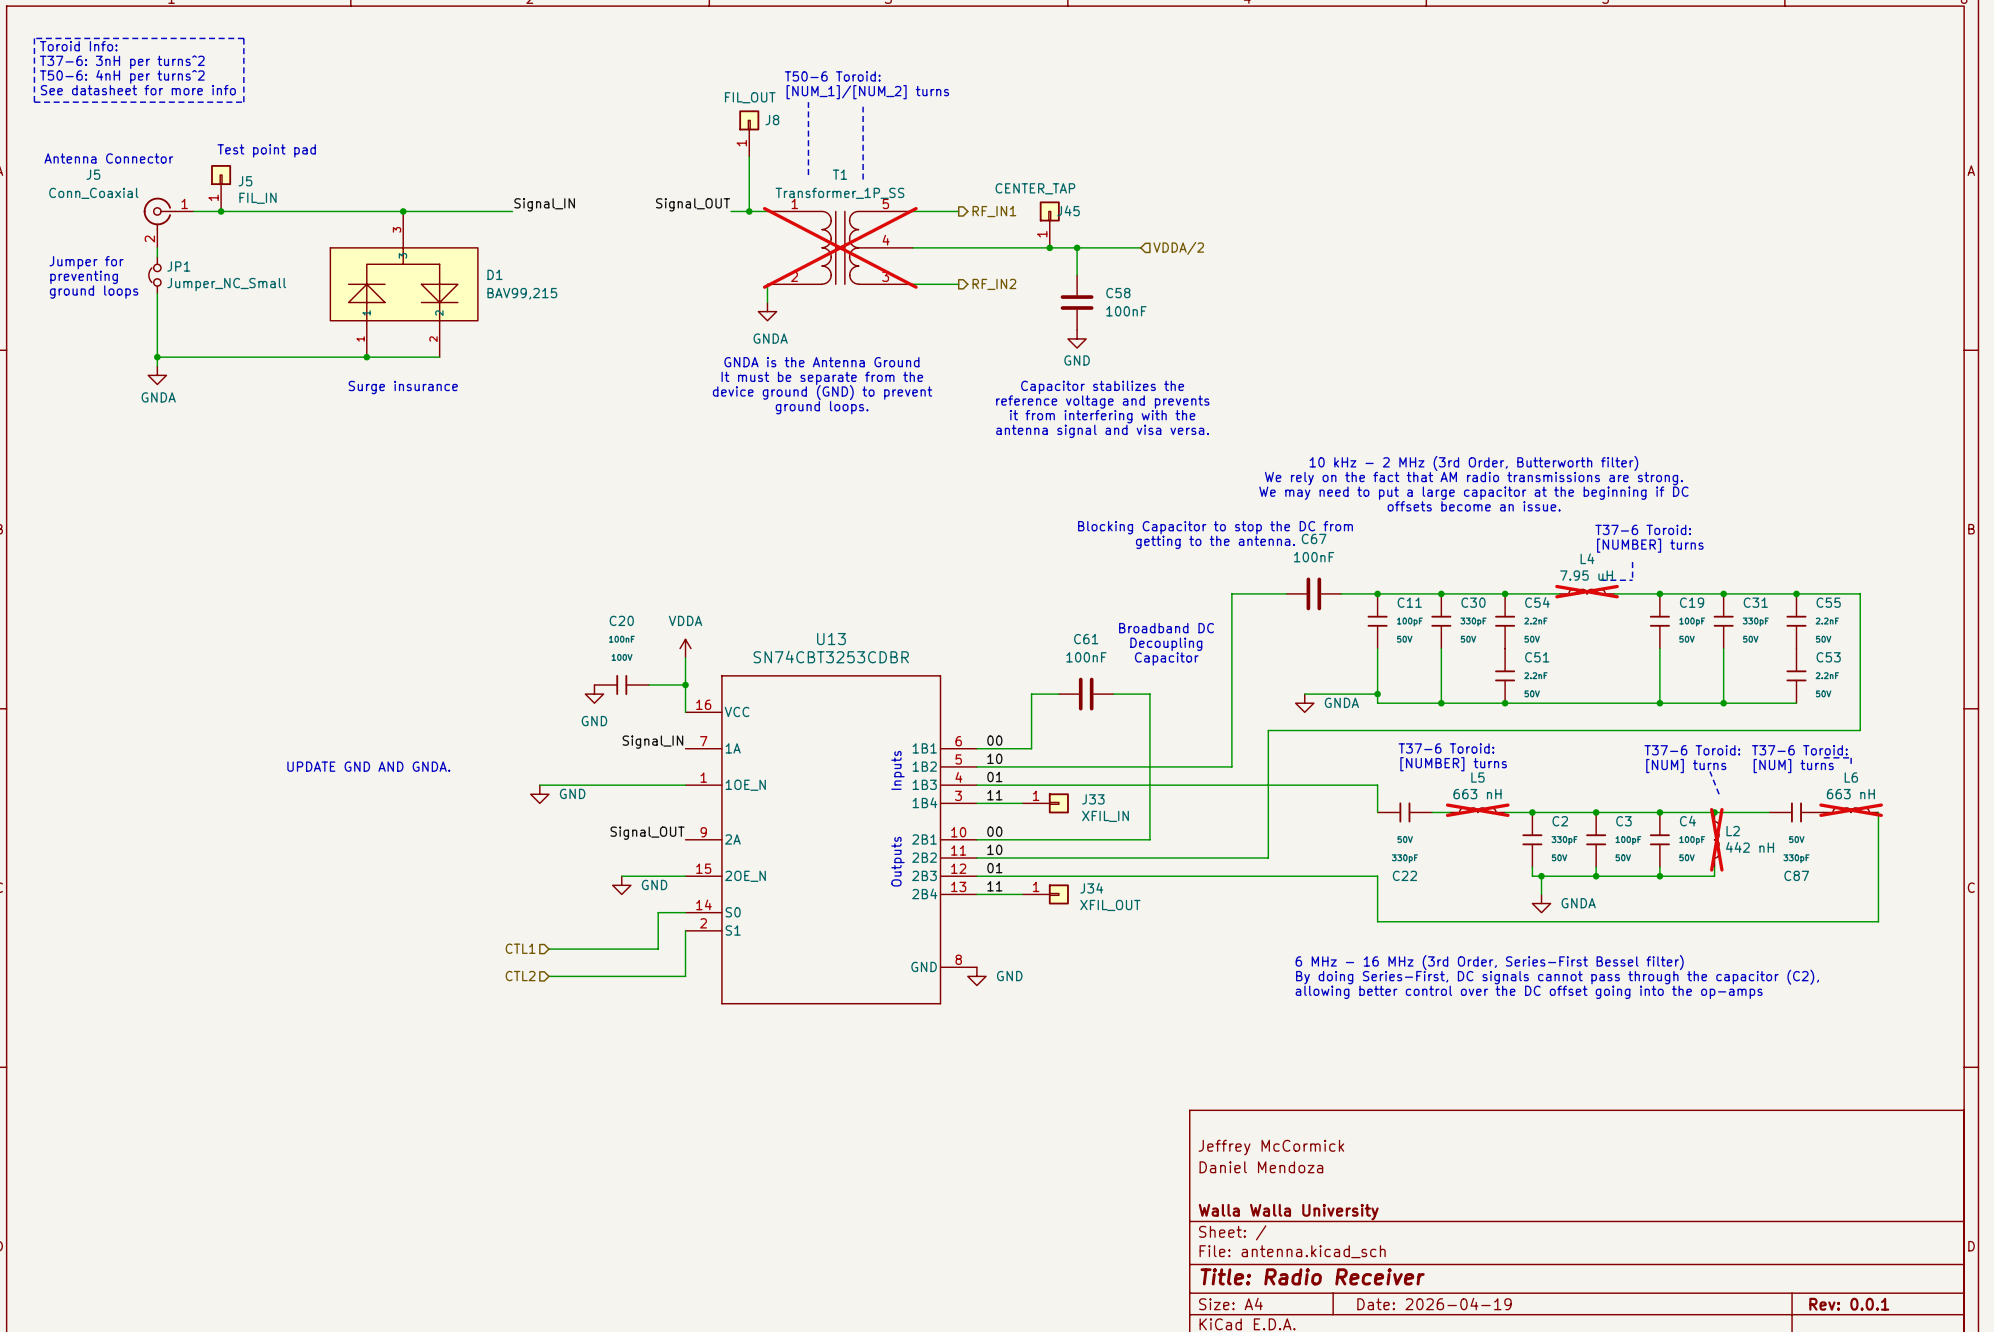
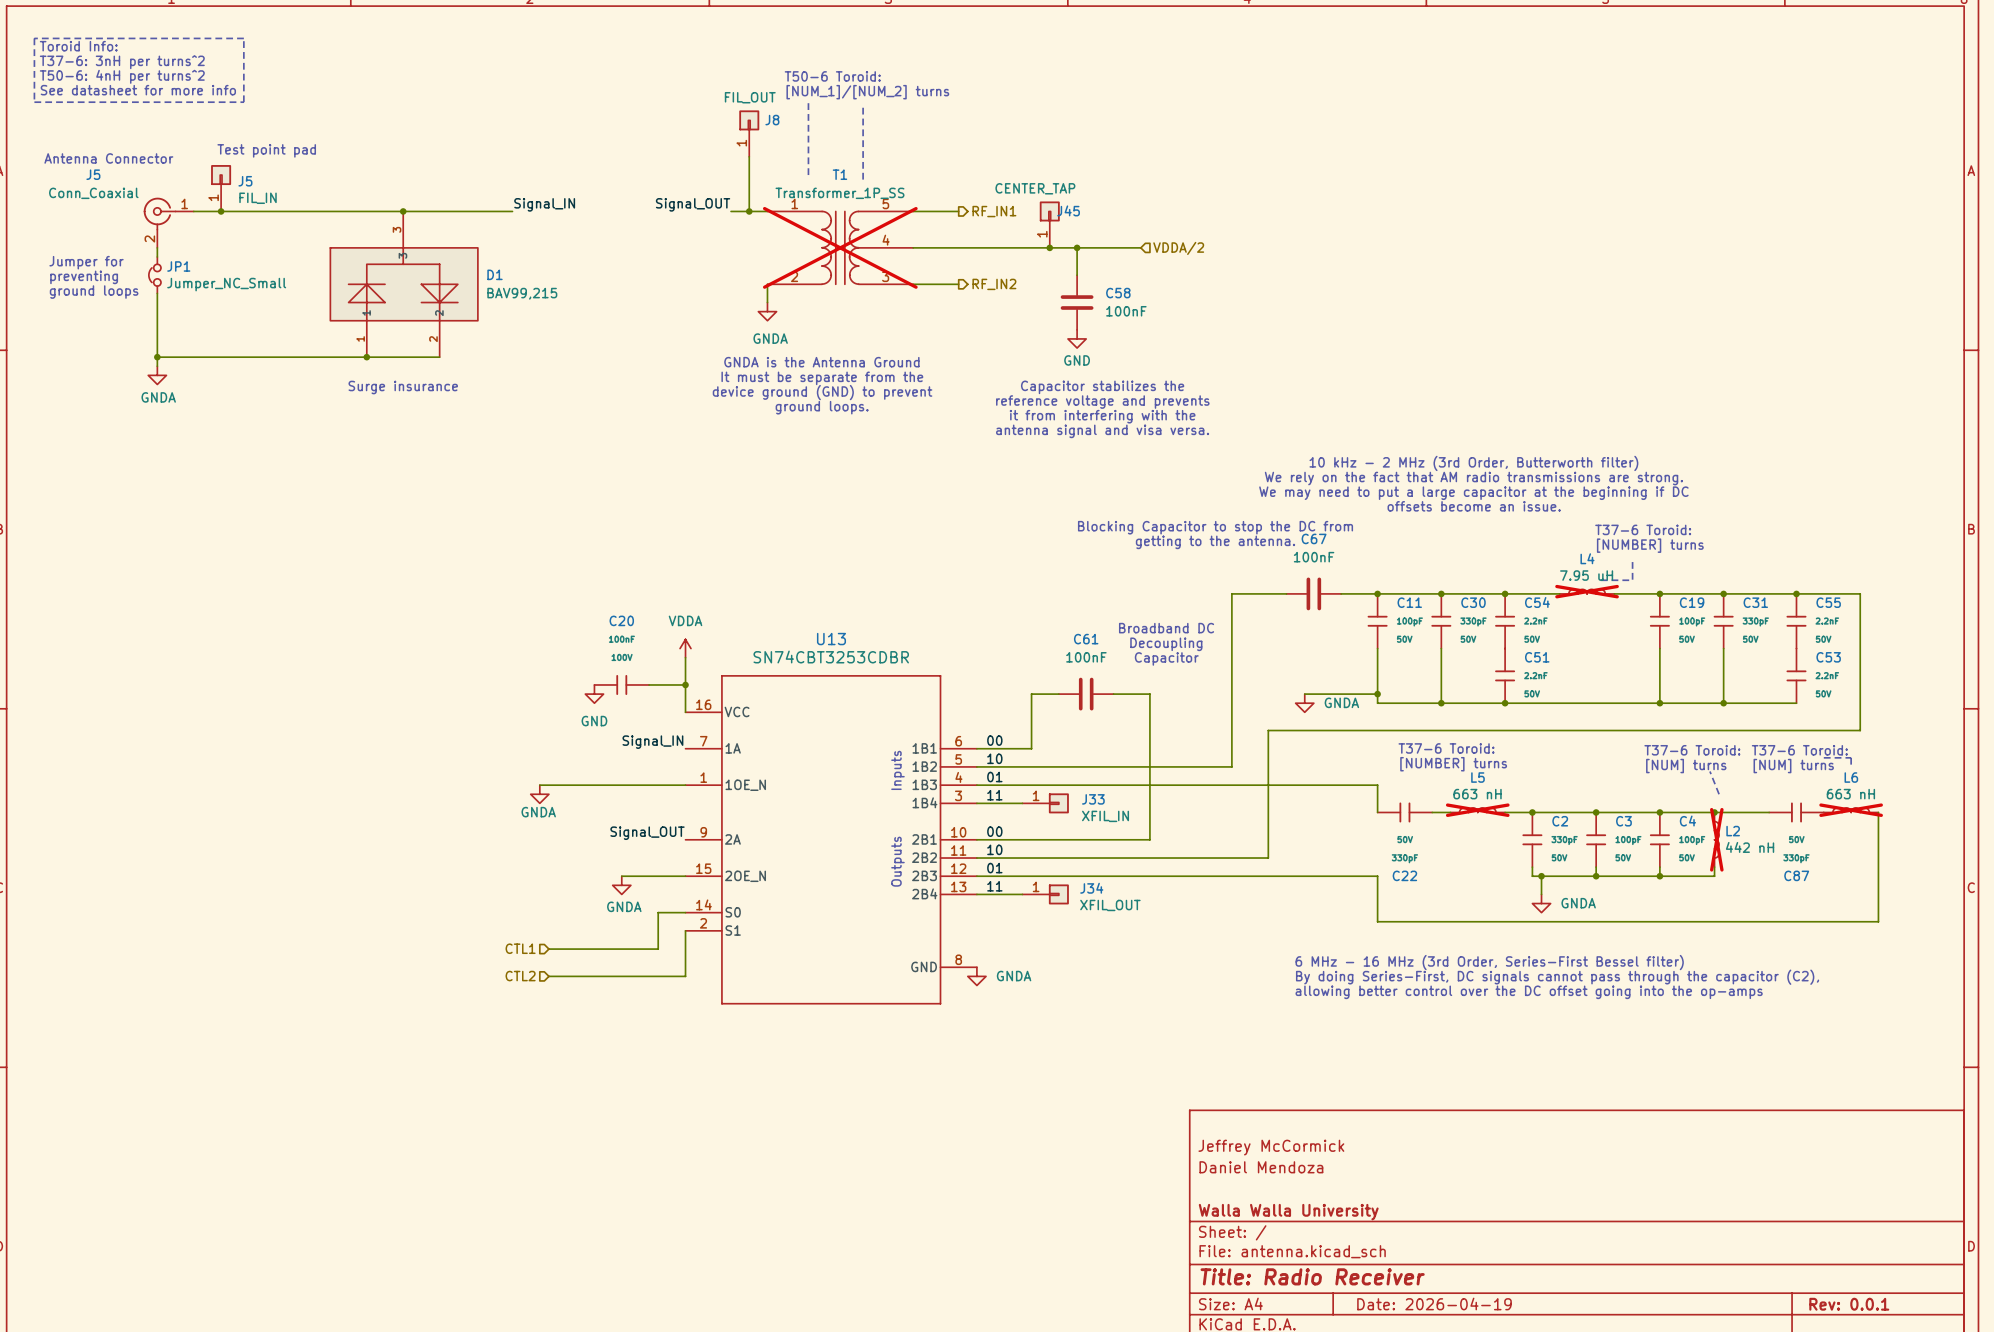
text: UPDATE GND AND GNDA. (368, 766) -> none
power symbol: GND (539, 794) -> GNDA (539, 794)
power symbol: GND (621, 885) -> GNDA (621, 885)
power symbol: GND (976, 976) -> GNDA (976, 976)

